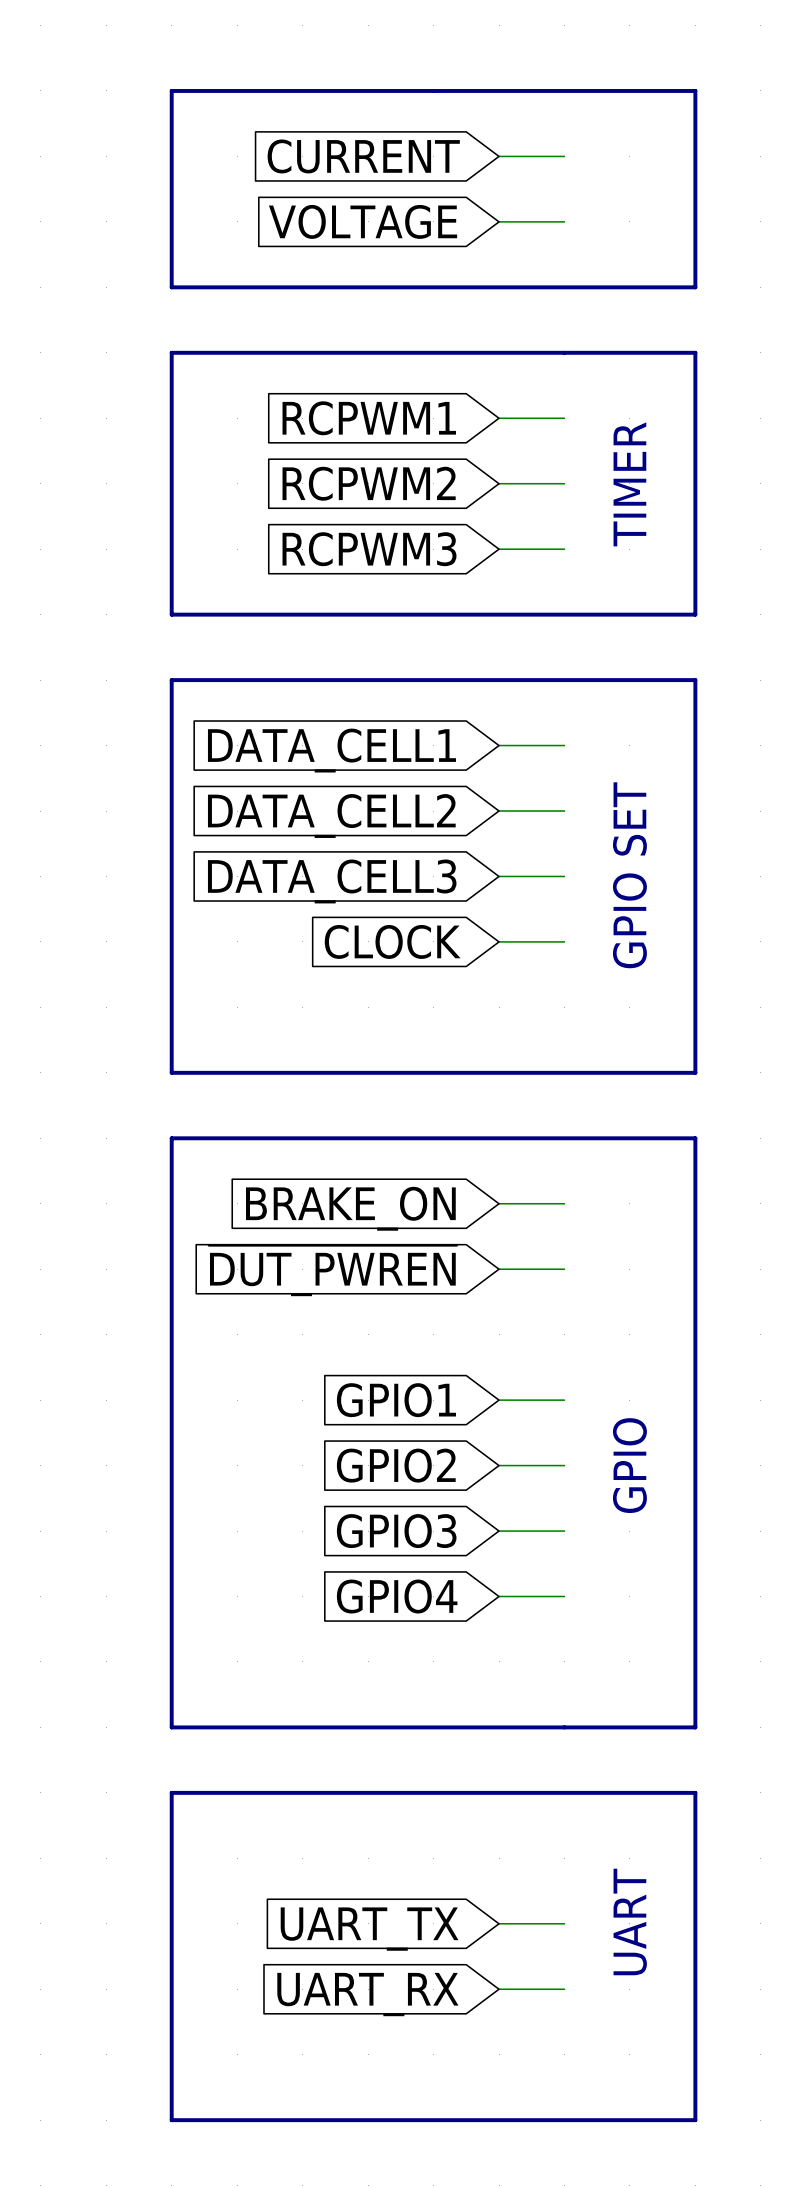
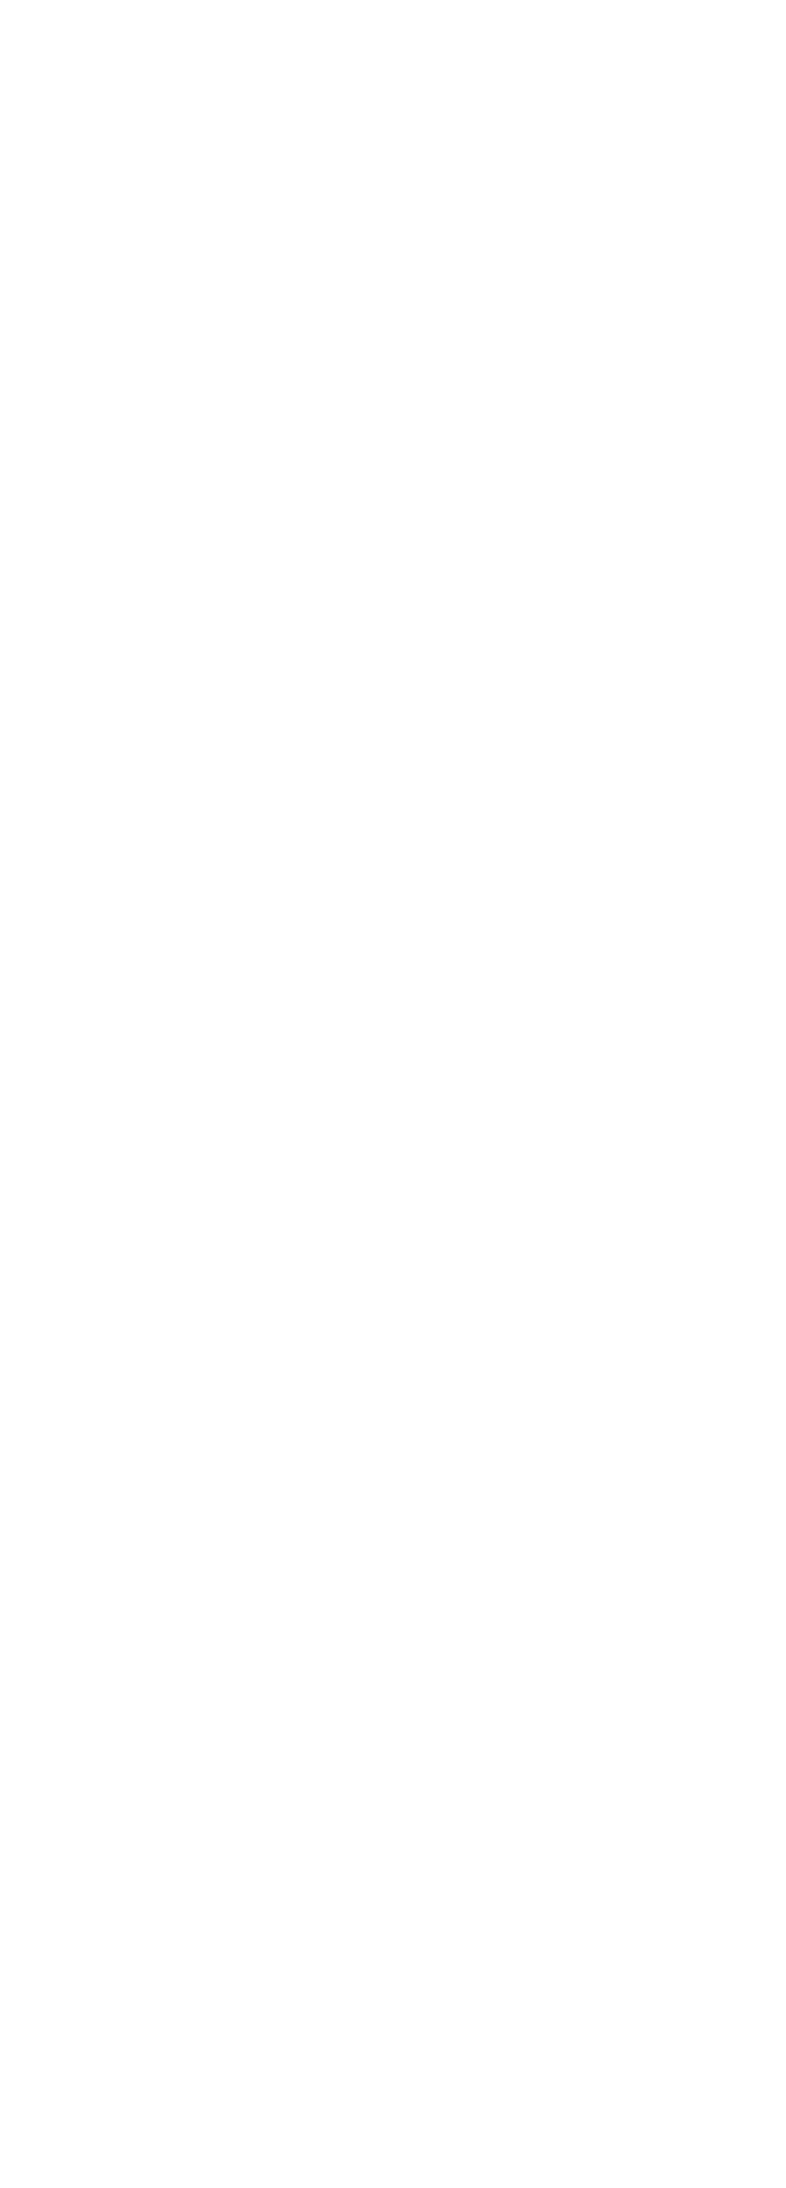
line: (171, 90) (171, 287) (695, 287) (695, 90) (171, 90) -> none
global label: CURRENT (363, 156) -> none
wire: (499, 156) (564, 156) -> none
global label: VOLTAGE (363, 221) -> none
wire: (499, 221) (564, 221) -> none
line: (171, 352) (695, 352) (695, 614) (171, 614) (171, 352) -> none
global label: RCPWM1 (369, 418) -> none
wire: (499, 418) (564, 418) -> none
global label: RCPWM2 (369, 483) -> none
wire: (499, 483) (564, 483) -> none
text: TIMER (629, 484) -> none
global label: RCPWM3 (369, 549) -> none
wire: (499, 549) (564, 549) -> none
line: (171, 680) (171, 1072) (695, 1072) (695, 680) (171, 680) -> none
wire: (499, 745) (564, 745) -> none
global label: DATA_CELL1 (331, 750) -> none
wire: (499, 811) (564, 811) -> none
global label: DATA_CELL2 (331, 816) -> none
text: GPIO SET (629, 875) -> none
wire: (499, 876) (564, 876) -> none
global label: DATA_CELL3 (332, 881) -> none
global label: CLOCK (392, 941) -> none
wire: (499, 941) (564, 941) -> none
line: (171, 1138) (171, 1727) (695, 1727) (695, 1138) (171, 1138) -> none
wire: (499, 1203) (564, 1203) -> none
global label: BRAKE_ON (350, 1208) -> none
wire: (499, 1269) (564, 1269) -> none
global label: ~{DUT_PWREN} (332, 1270) -> none
global label: GPIO1 (396, 1400) -> none
wire: (499, 1400) (564, 1400) -> none
global label: GPIO2 (396, 1465) -> none
wire: (499, 1465) (564, 1465) -> none
text: GPIO (629, 1465) -> none
global label: GPIO3 (396, 1531) -> none
wire: (499, 1531) (564, 1531) -> none
global label: GPIO4 (397, 1596) -> none
wire: (499, 1596) (564, 1596) -> none
line: (171, 1792) (171, 2120) (695, 2120) (695, 1792) (171, 1792) -> none
text: UART (630, 1921) -> none
wire: (499, 1923) (564, 1923) -> none
global label: UART_TX (369, 1929) -> none
wire: (499, 1989) (564, 1989) -> none
global label: UART_RX (367, 1994) -> none

